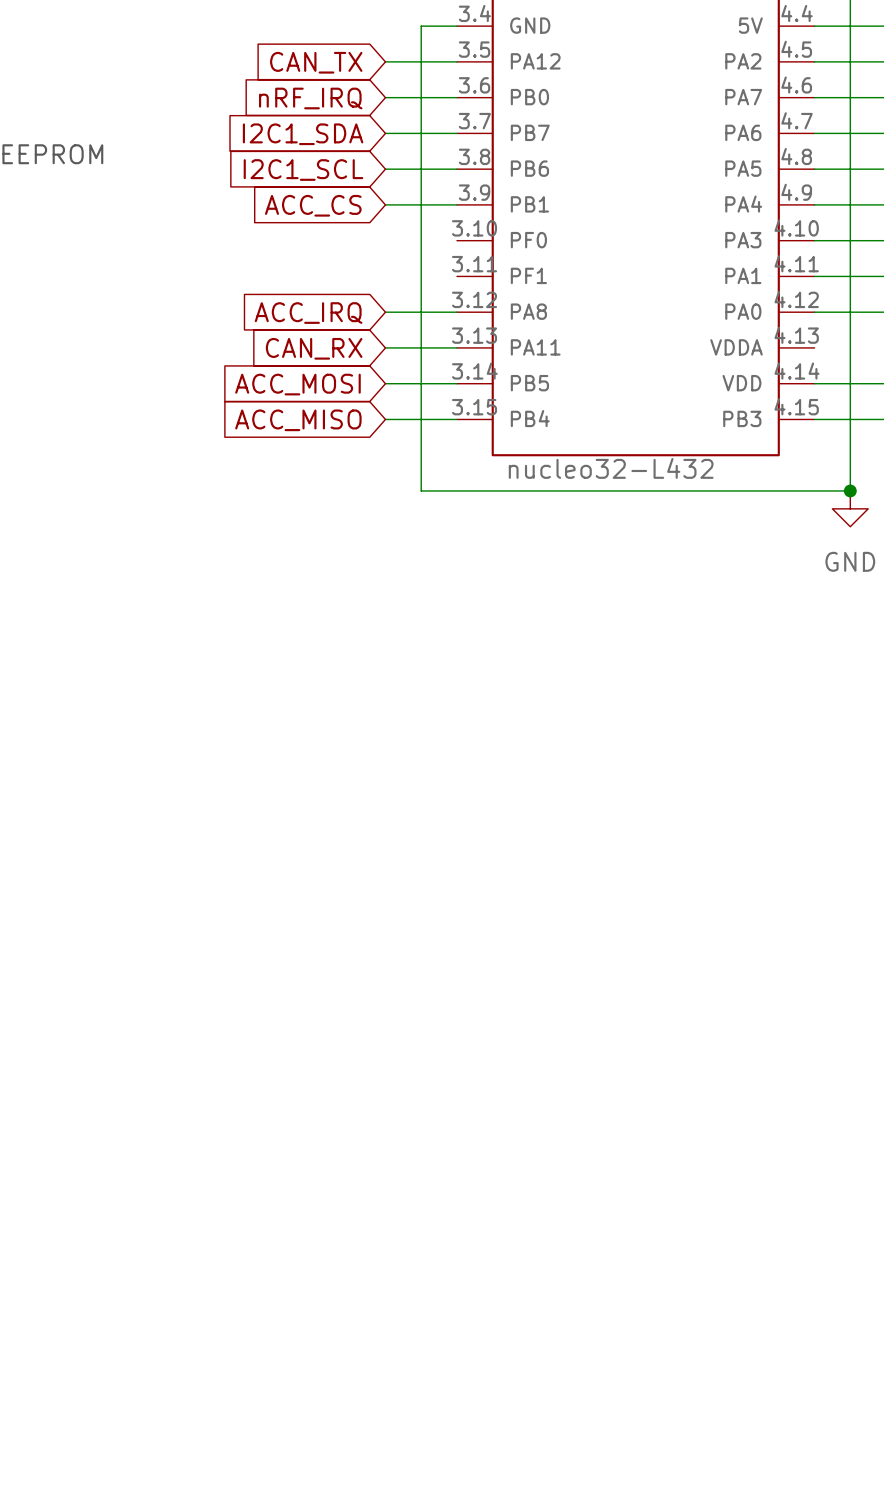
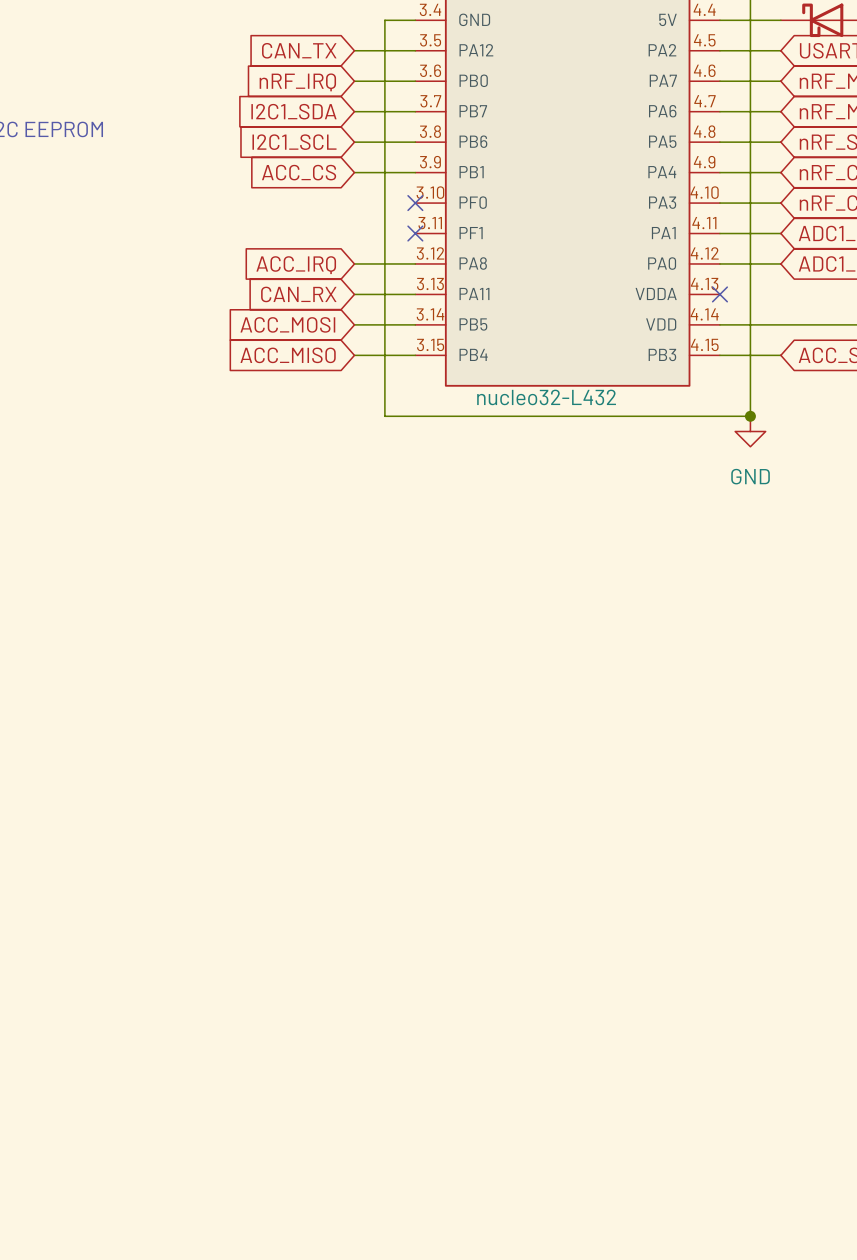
no-connect mark: none -> (415, 203)
no-connect mark: none -> (415, 233)
no-connect mark: none -> (719, 294)

